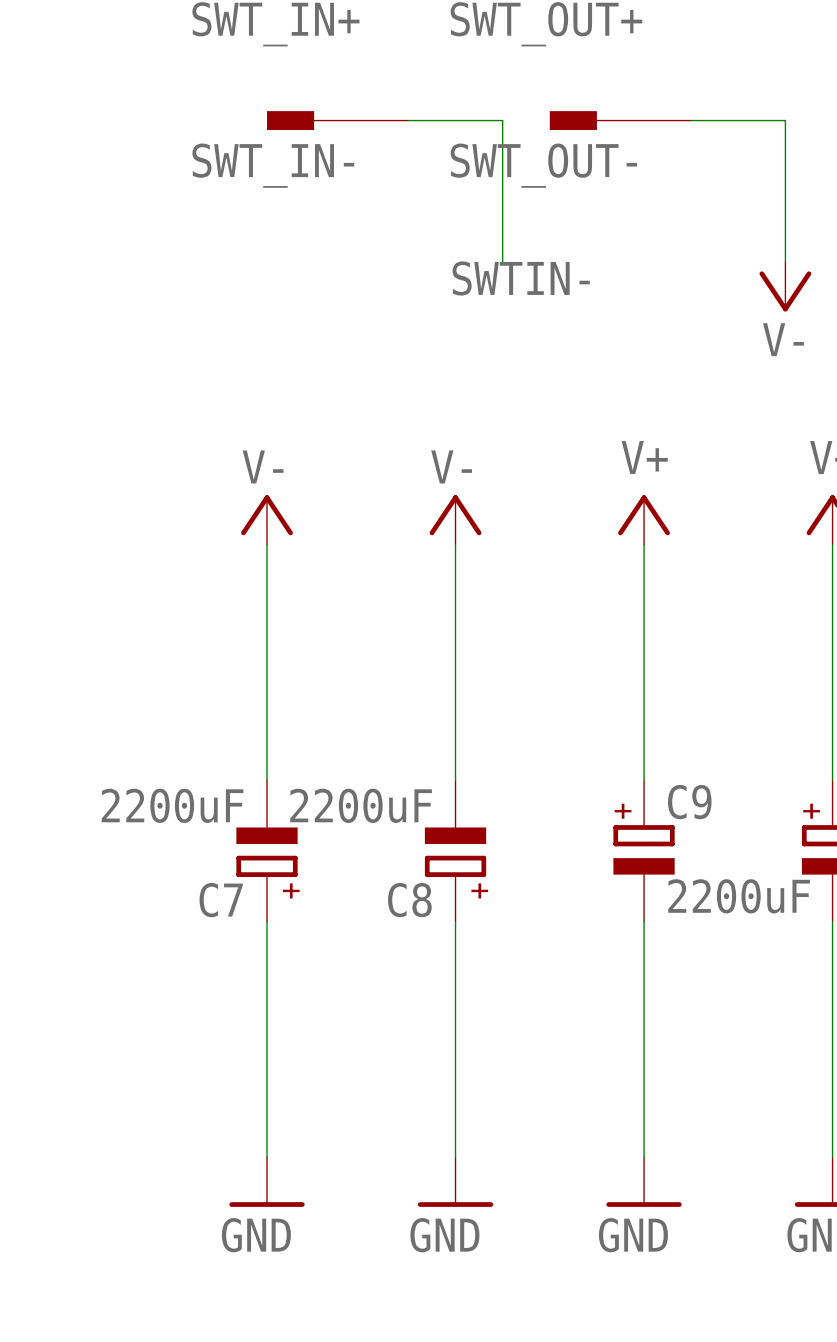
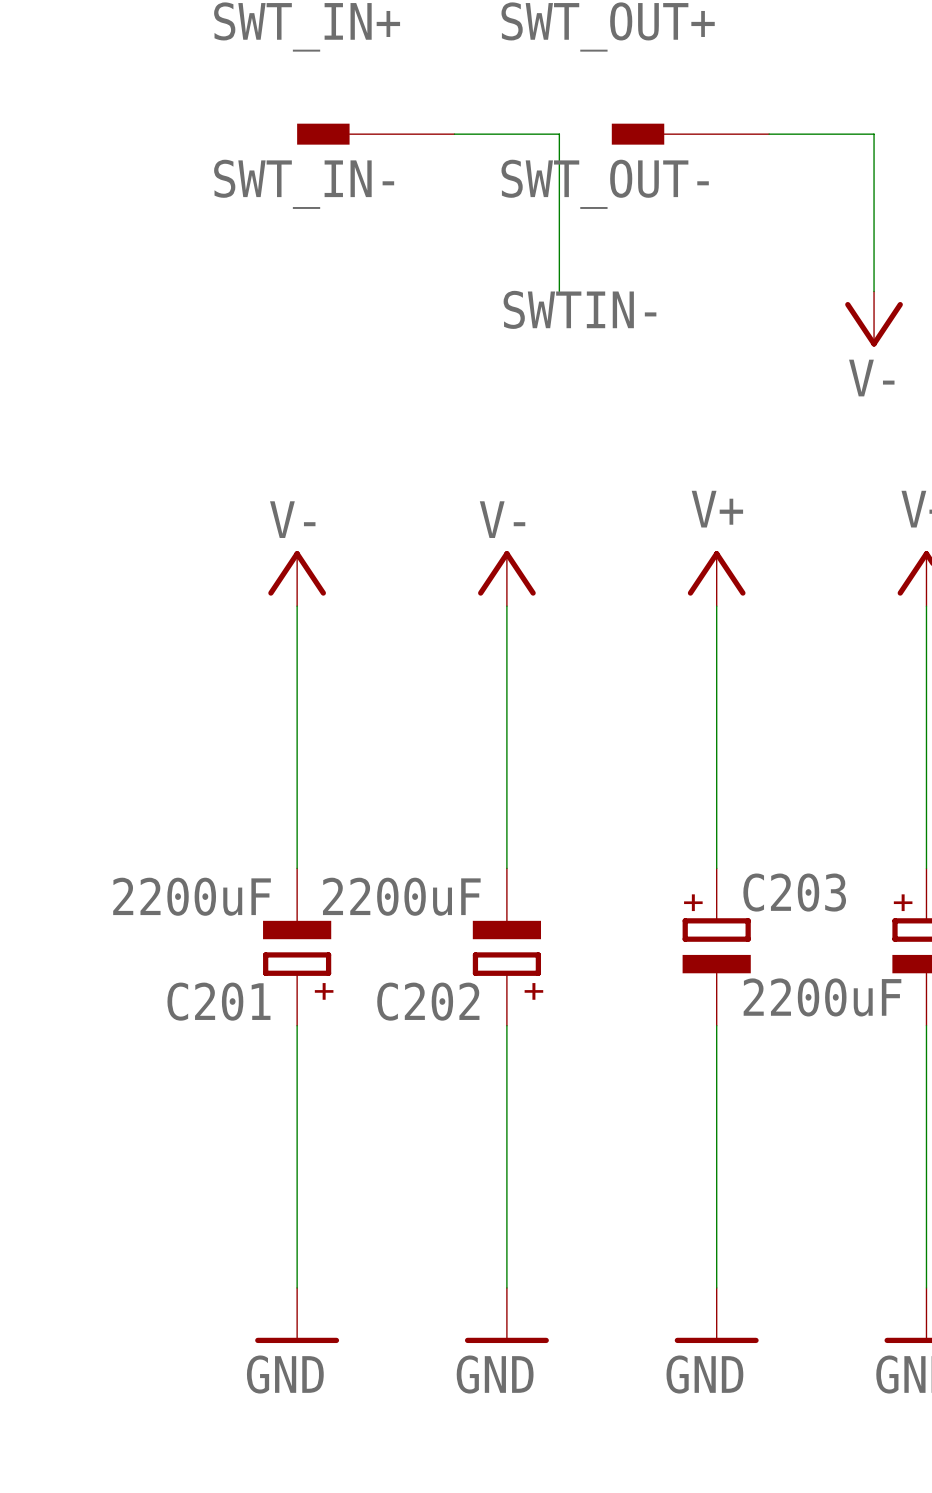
C9 name: C9 (689, 802) -> C203 (794, 892)
C7 name: C7 (221, 900) -> C201 (218, 1001)
C8 name: C8 (409, 900) -> C202 (428, 1001)

